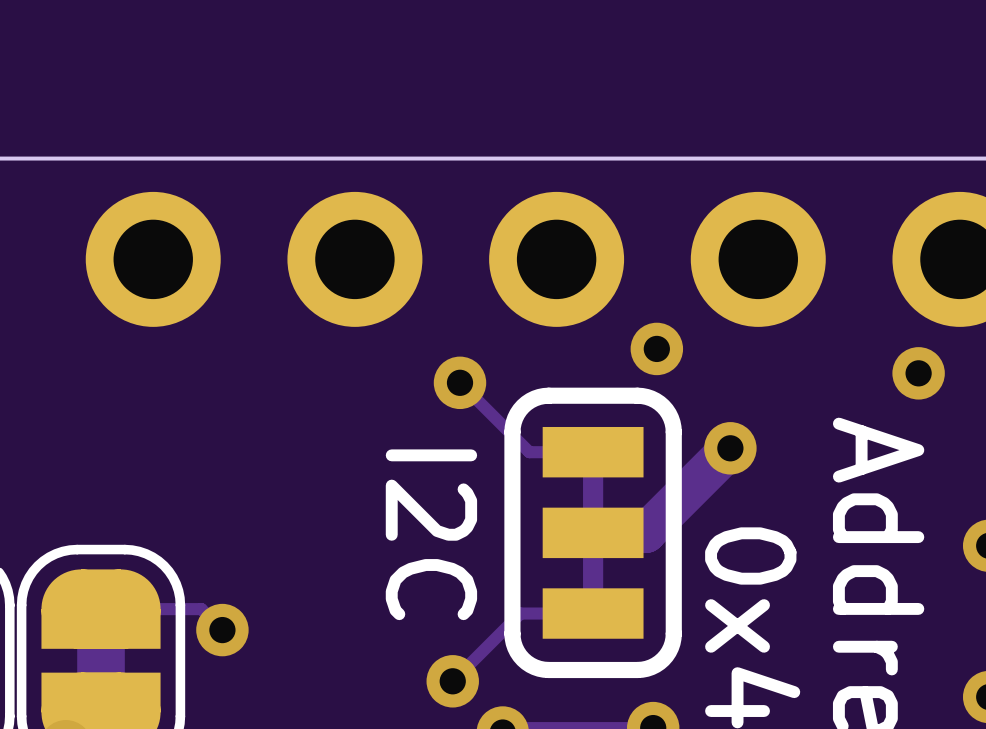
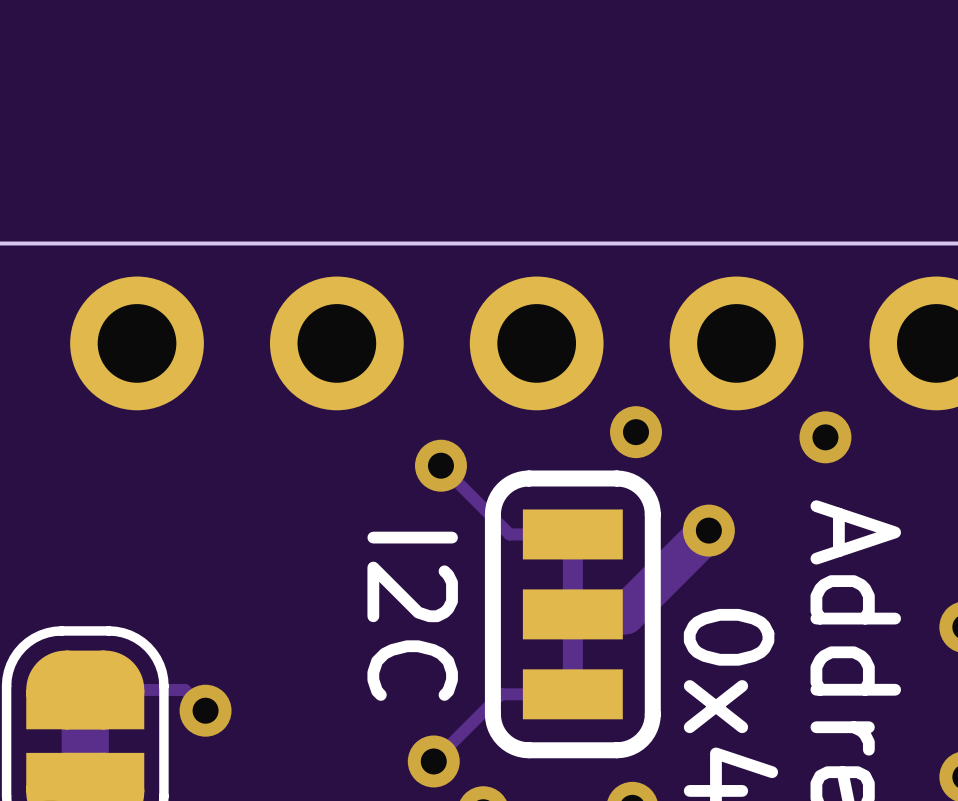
via position: (918, 373) -> (825, 437)

